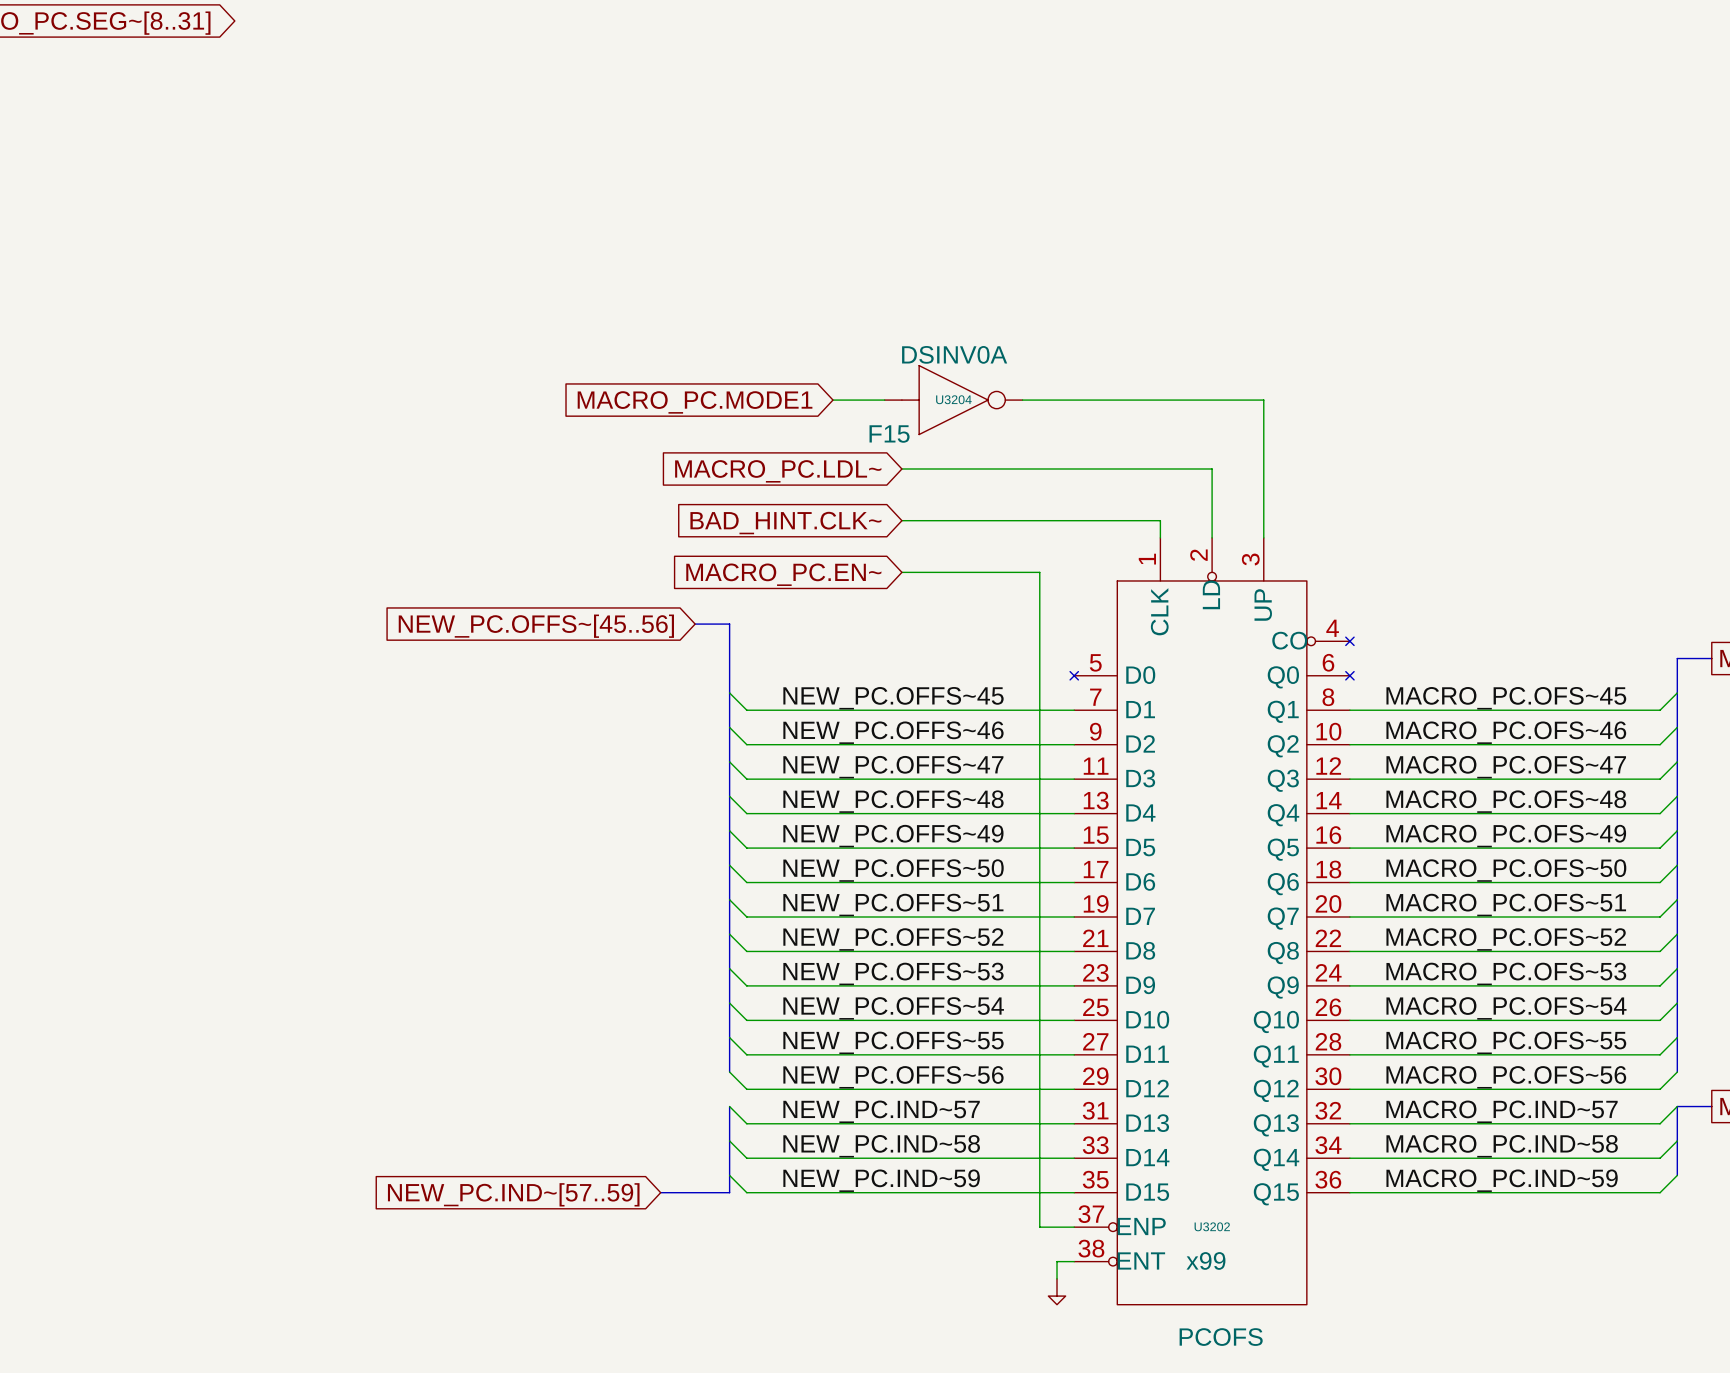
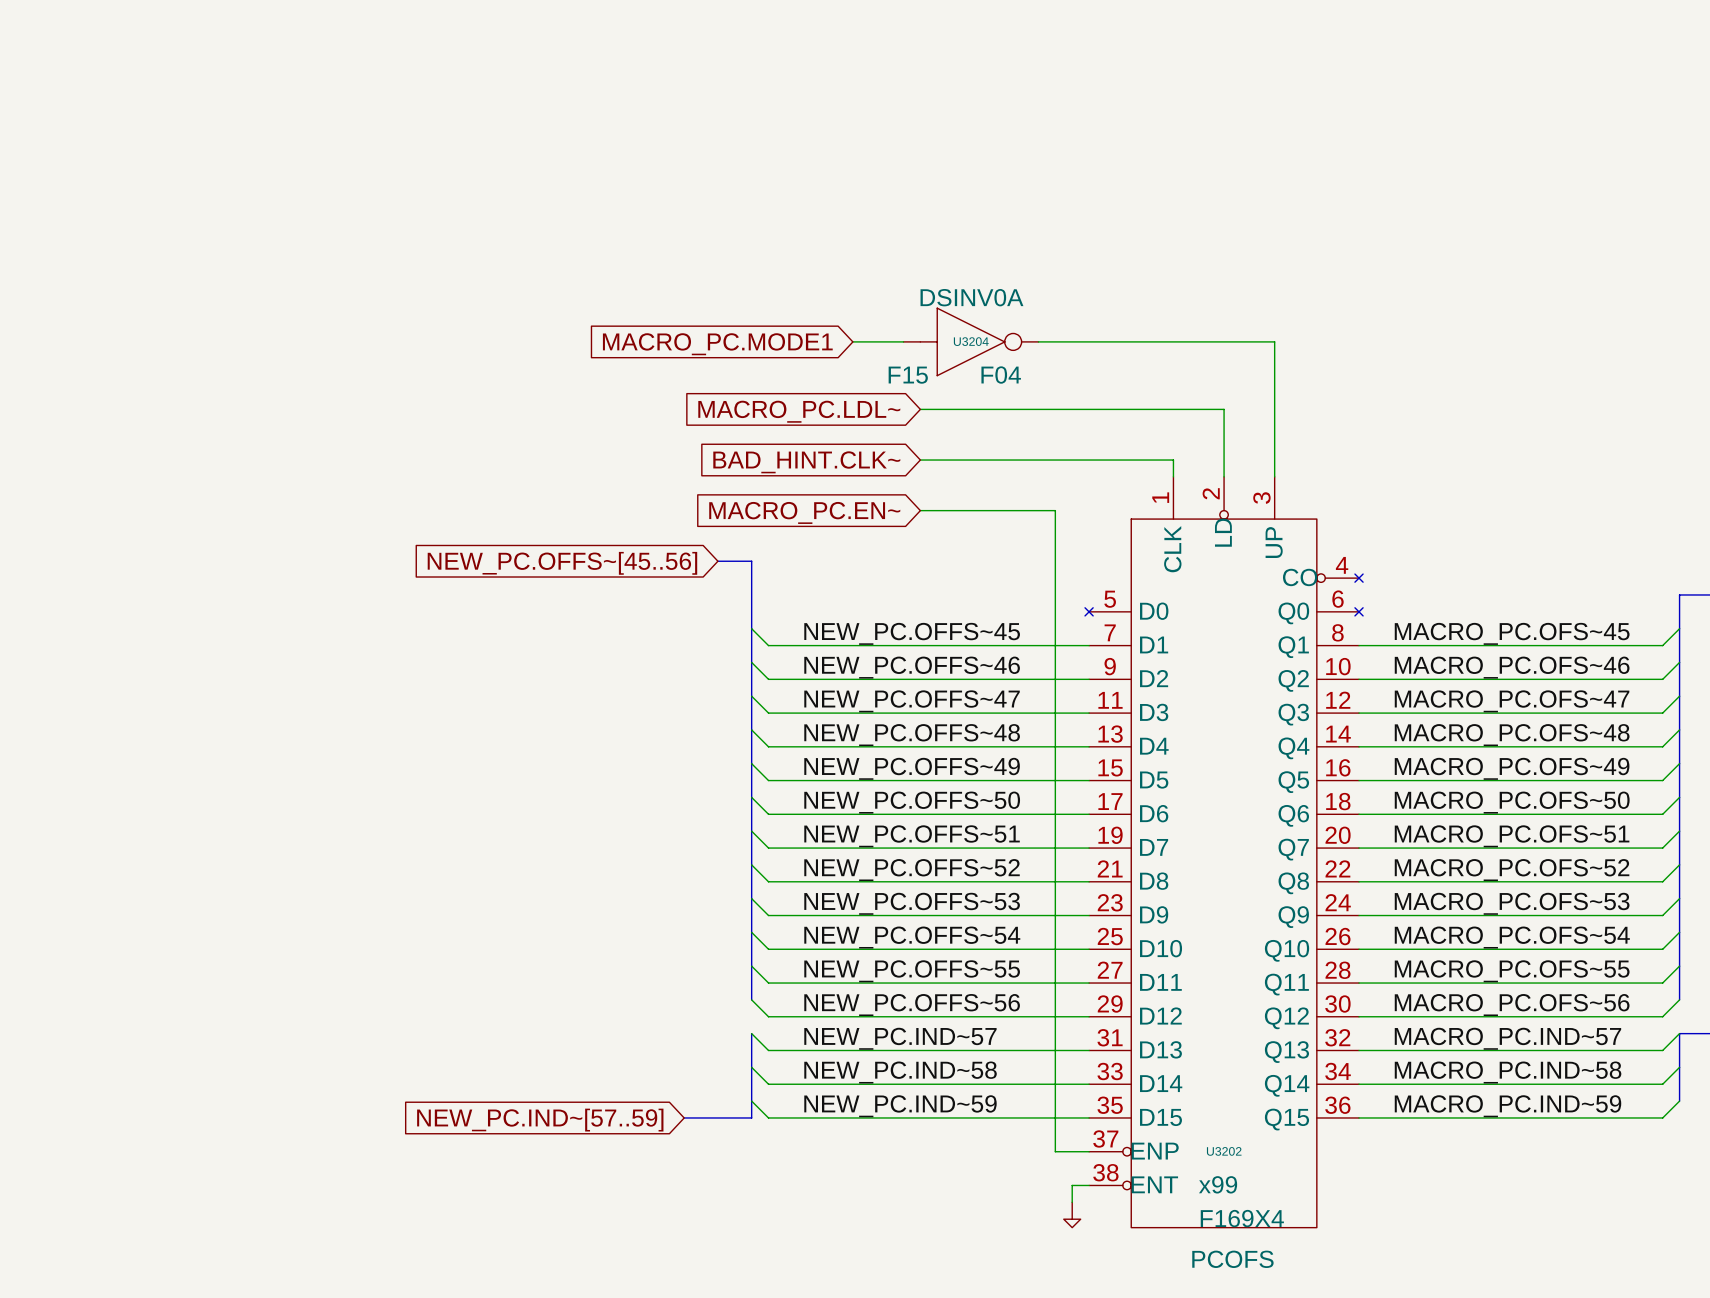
U3204 value: none -> F04 (1001, 375)
U3202 value: none -> F169X4 (1242, 1218)

